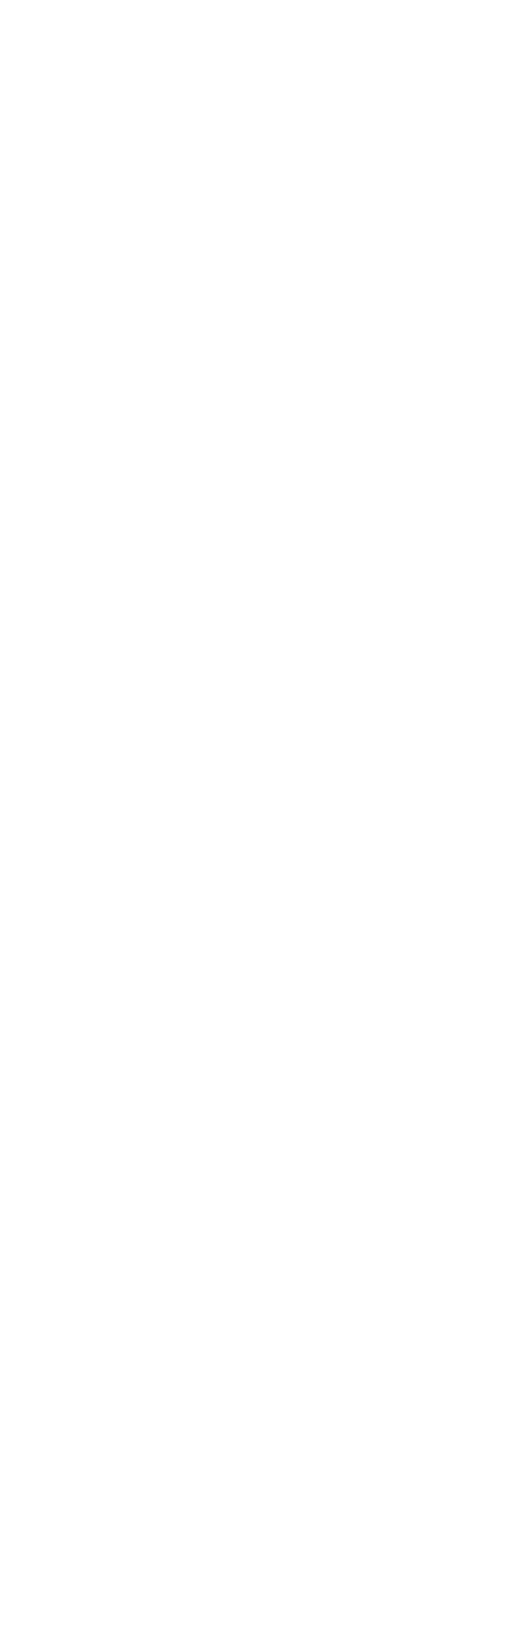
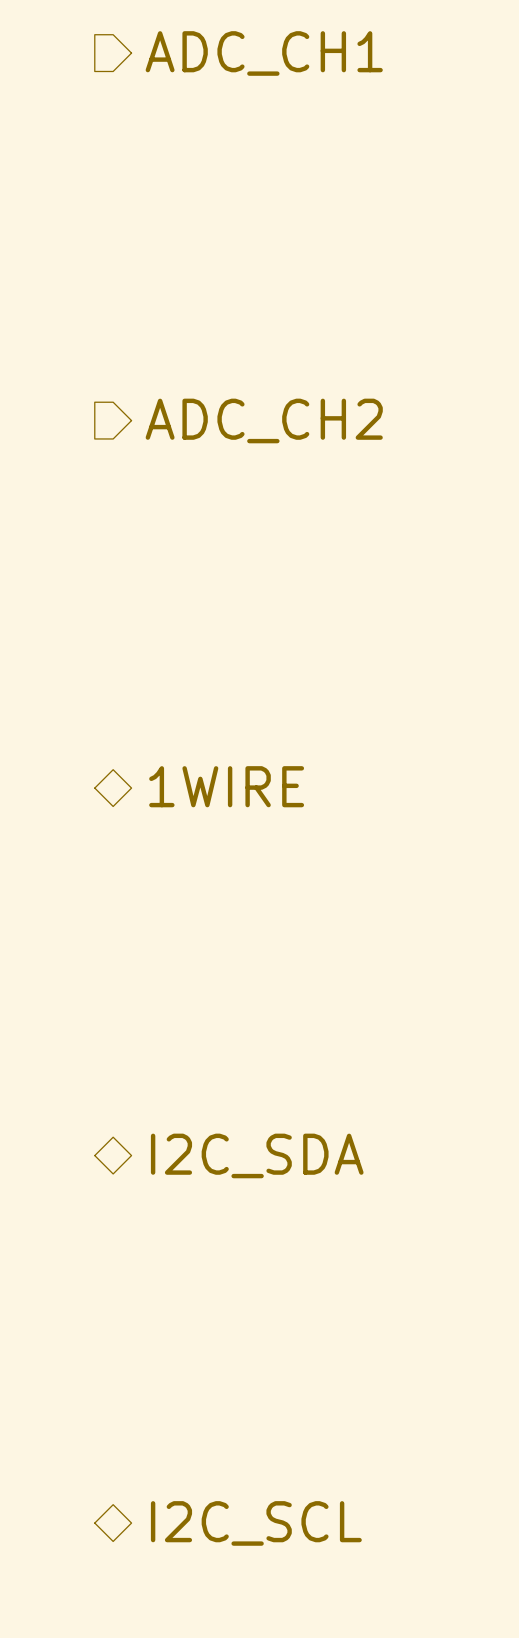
hierarchical label: none -> ADC_CH1 (264, 53)
hierarchical label: none -> ADC_CH2 (264, 420)
hierarchical label: none -> 1WIRE (226, 786)
hierarchical label: none -> I2C_SDA (257, 1155)
hierarchical label: none -> I2C_SCL (256, 1523)

